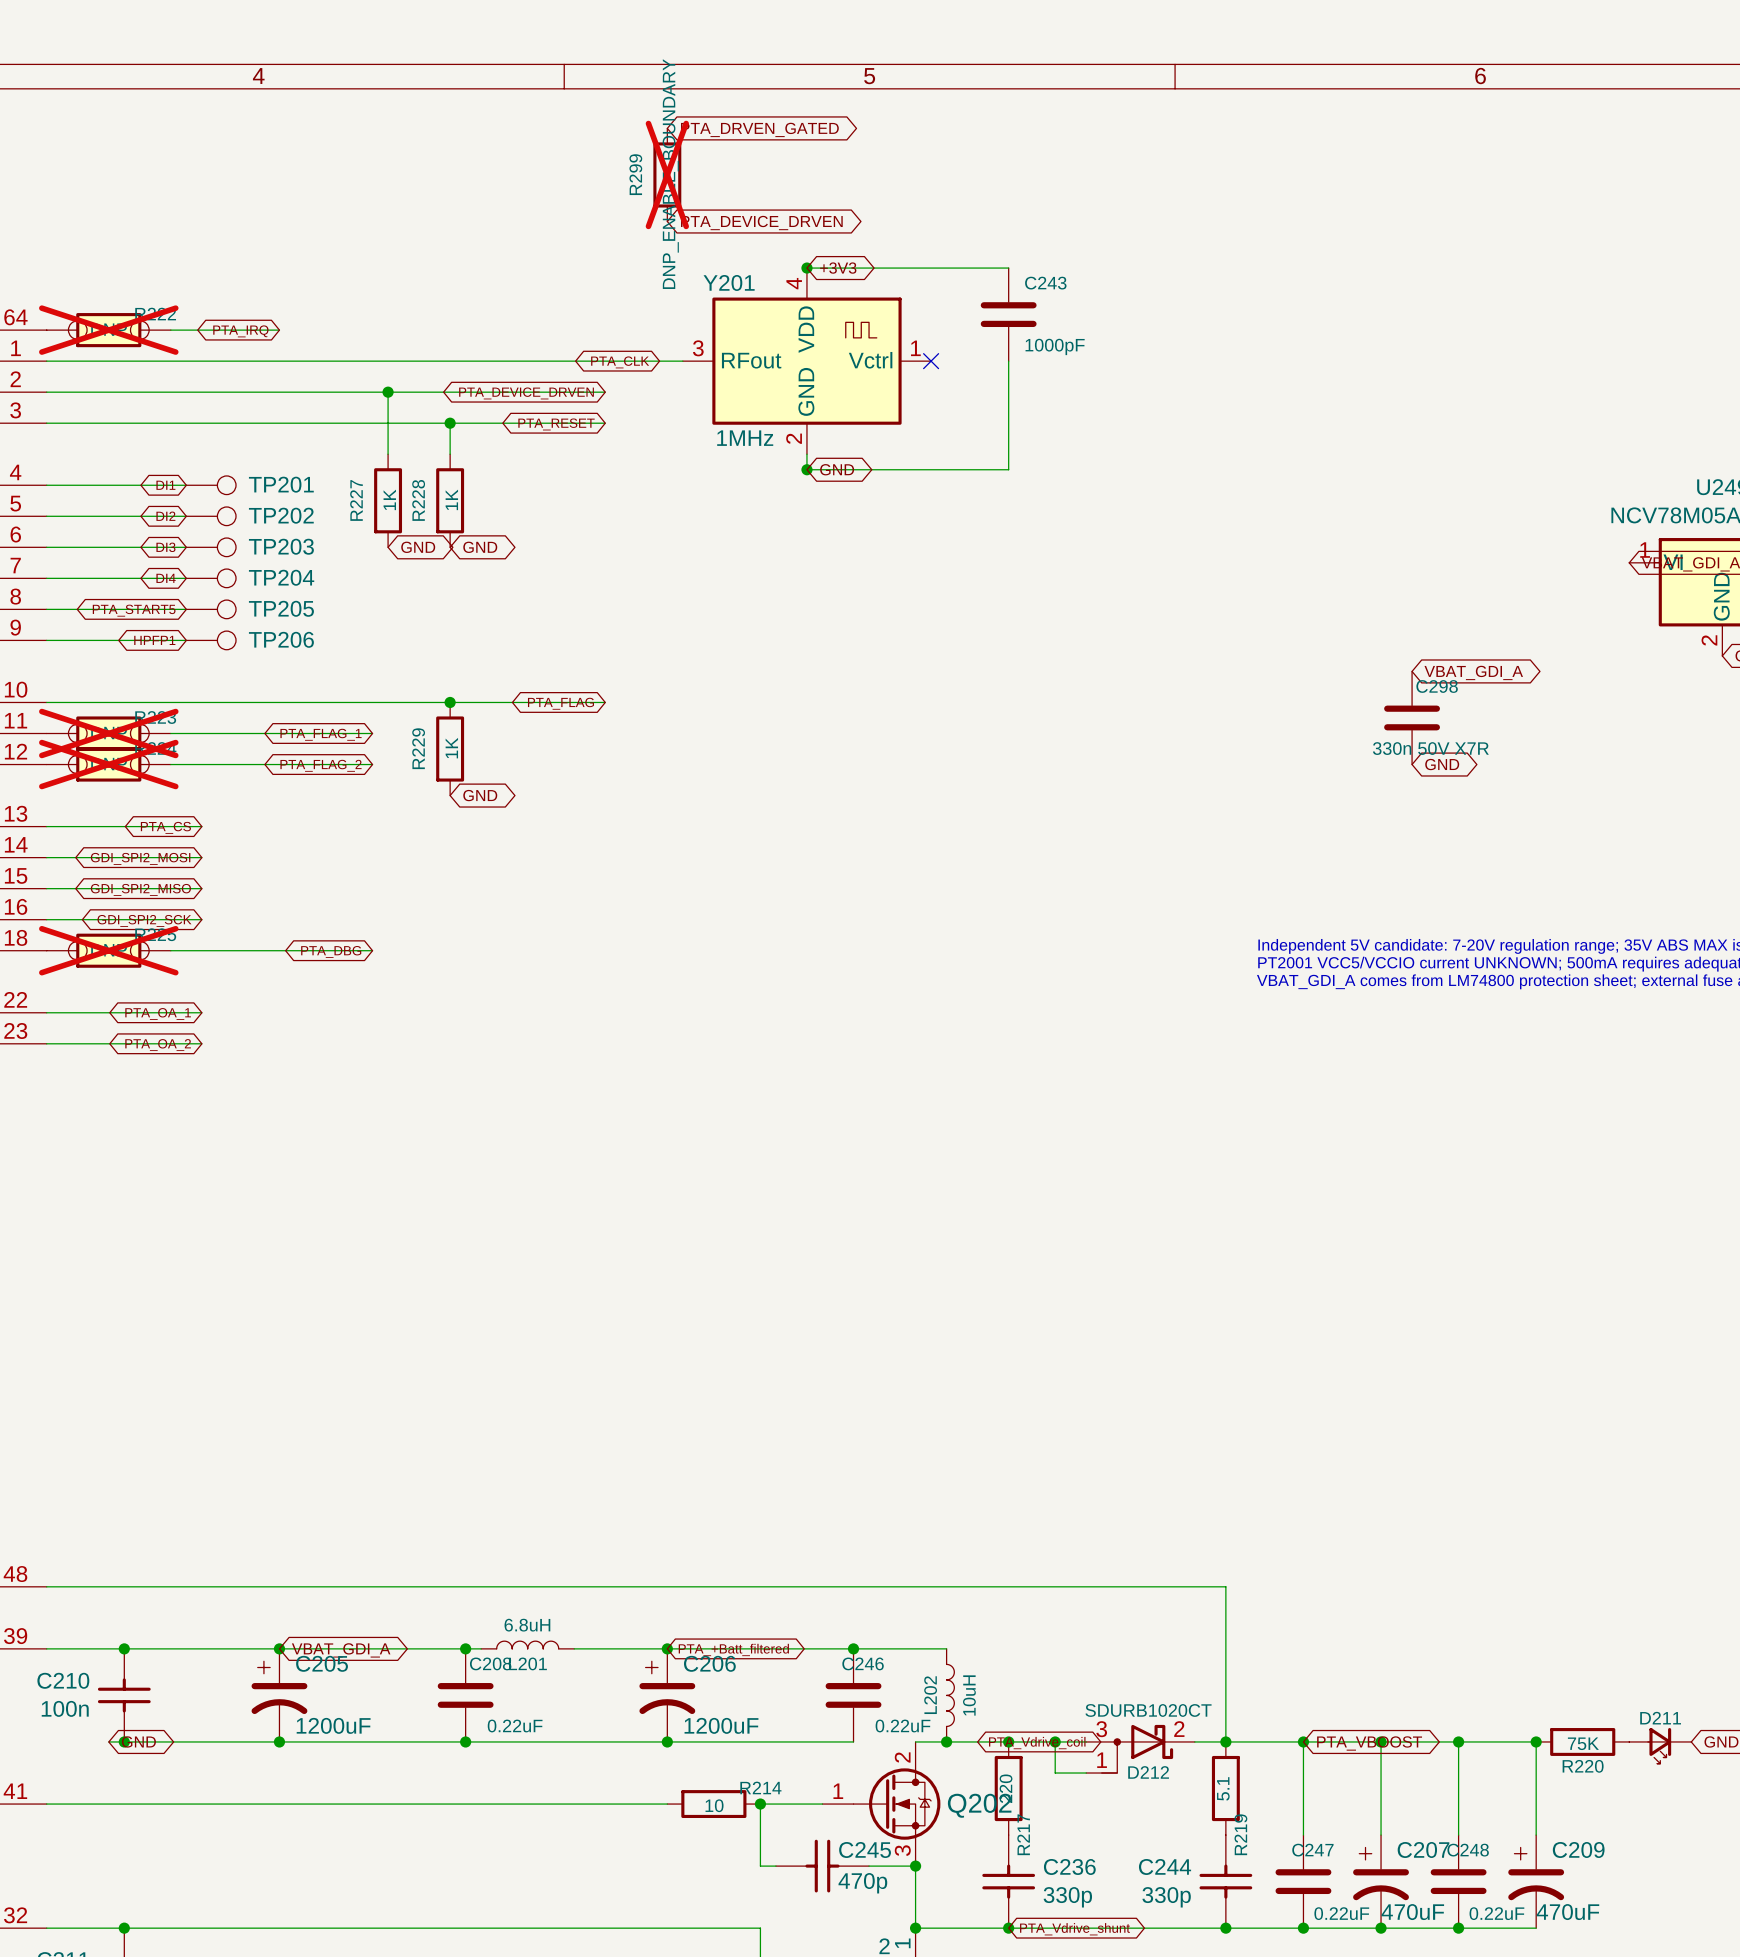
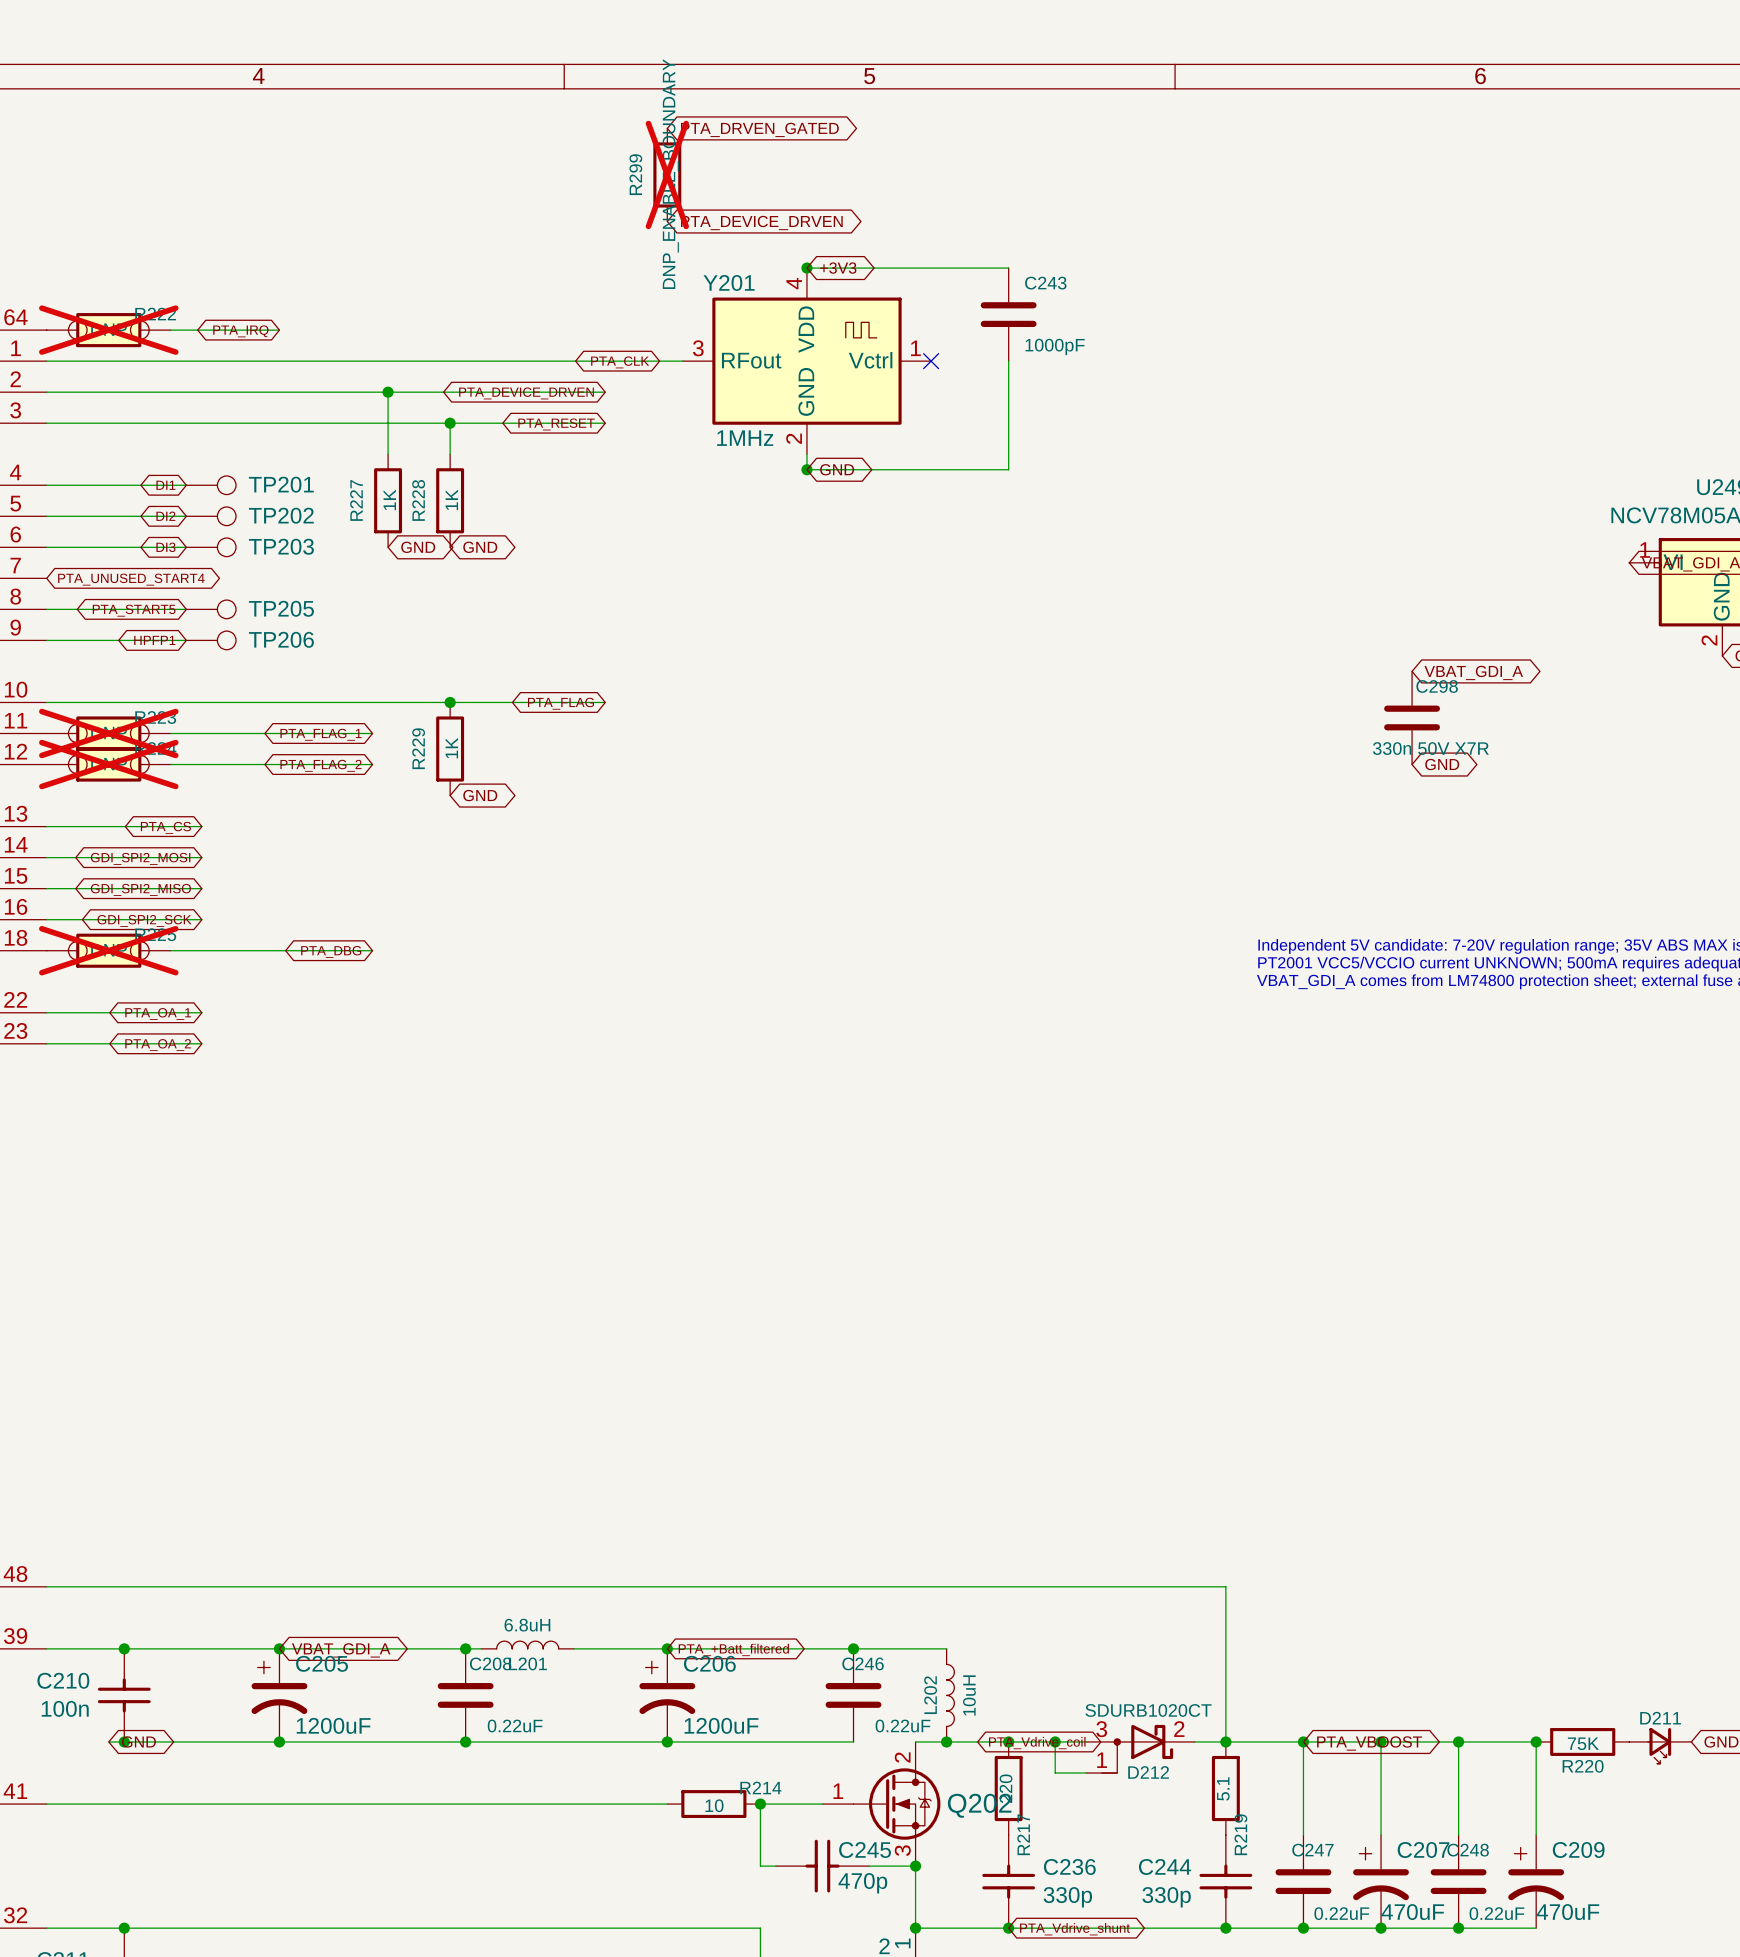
wire: (46, 578) (186, 578) -> none
global label: DI4 (166, 578) -> none
TP204: (211, 578) -> none
global label: none -> PTA_UNUSED_START4 (131, 579)

